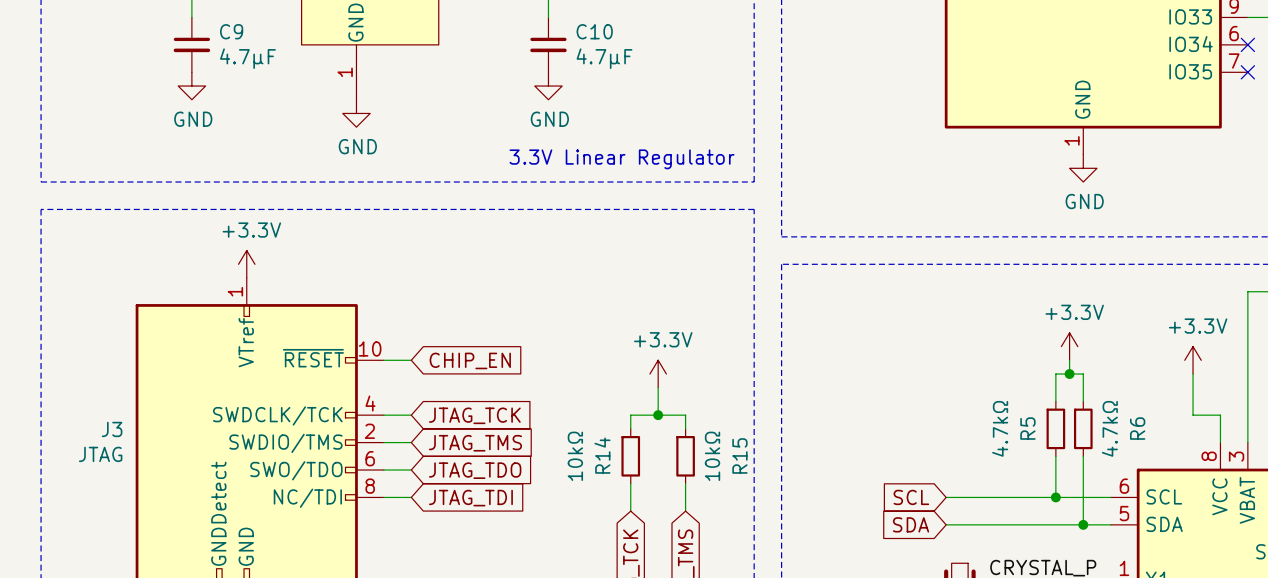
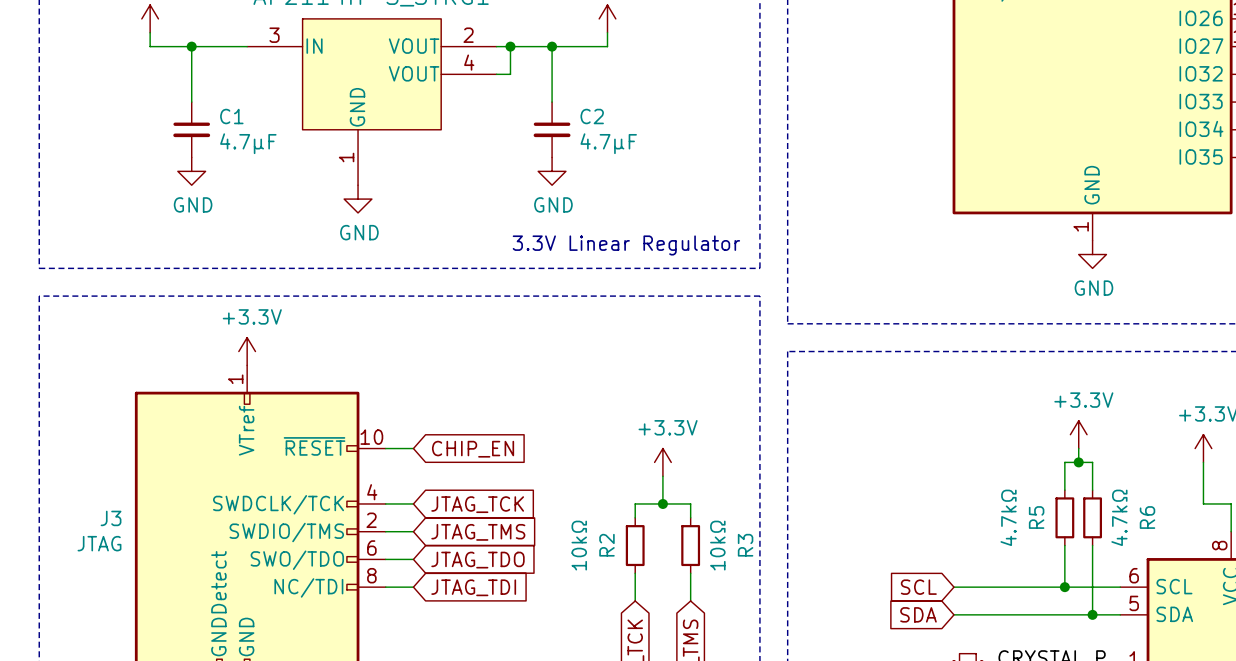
C9 name: C9 (231, 31) -> C1 (231, 116)
C10 name: C10 (594, 31) -> C2 (592, 116)
R14 name: R14 (602, 455) -> R2 (606, 545)
R15 name: R15 (739, 455) -> R3 (745, 545)

